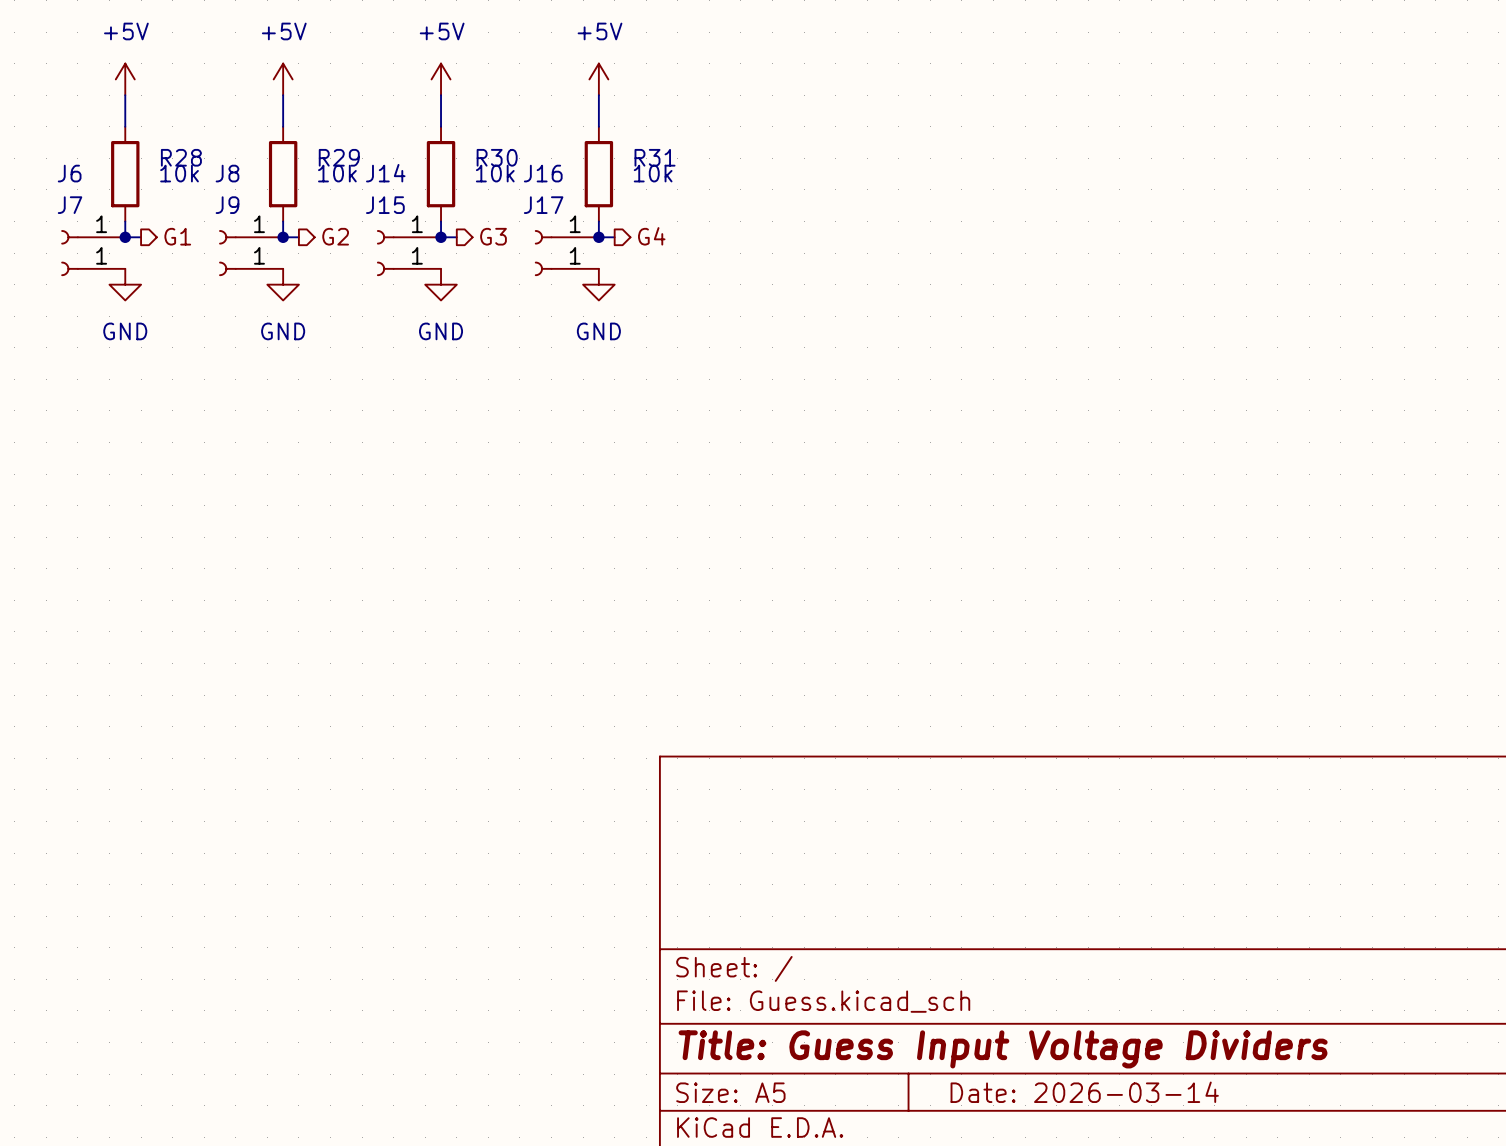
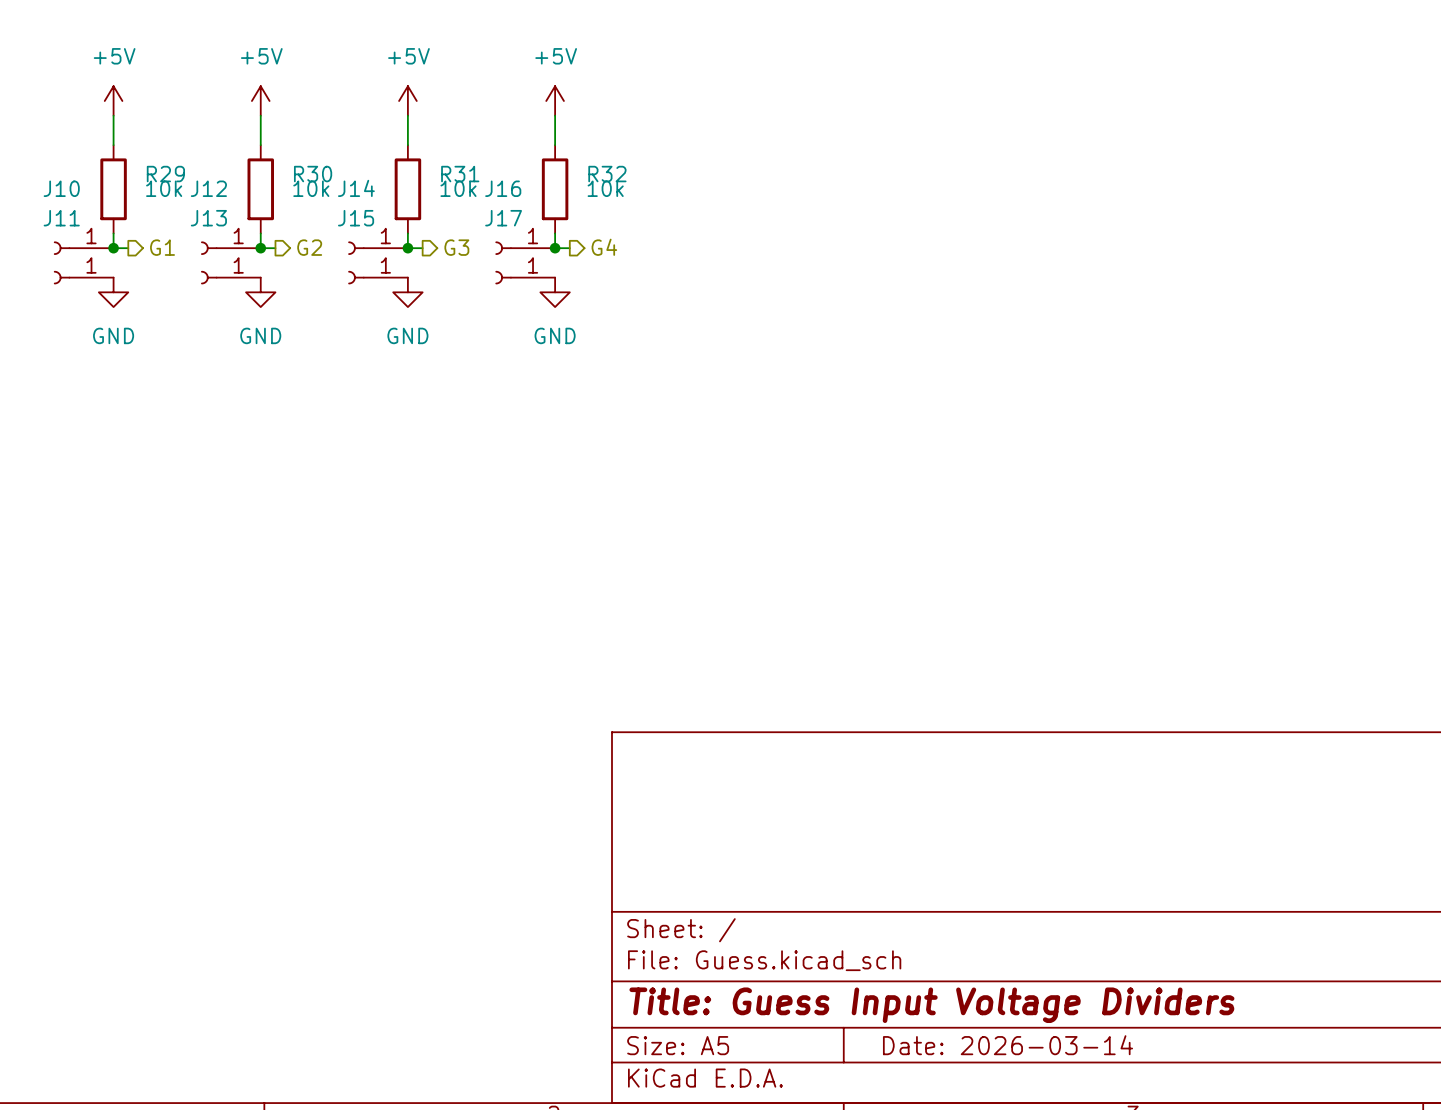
R28 name: R28 (181, 157) -> R29 (165, 174)
R29 name: R29 (339, 157) -> R30 (313, 174)
R30 name: R30 (497, 157) -> R31 (460, 174)
R31 name: R31 (655, 157) -> R32 (607, 174)
J6 name: J6 (69, 173) -> J10 (61, 188)
J8 name: J8 (227, 173) -> J12 (208, 188)
J7 name: J7 (70, 205) -> J11 (61, 218)
J9 name: J9 (227, 205) -> J13 (208, 218)

